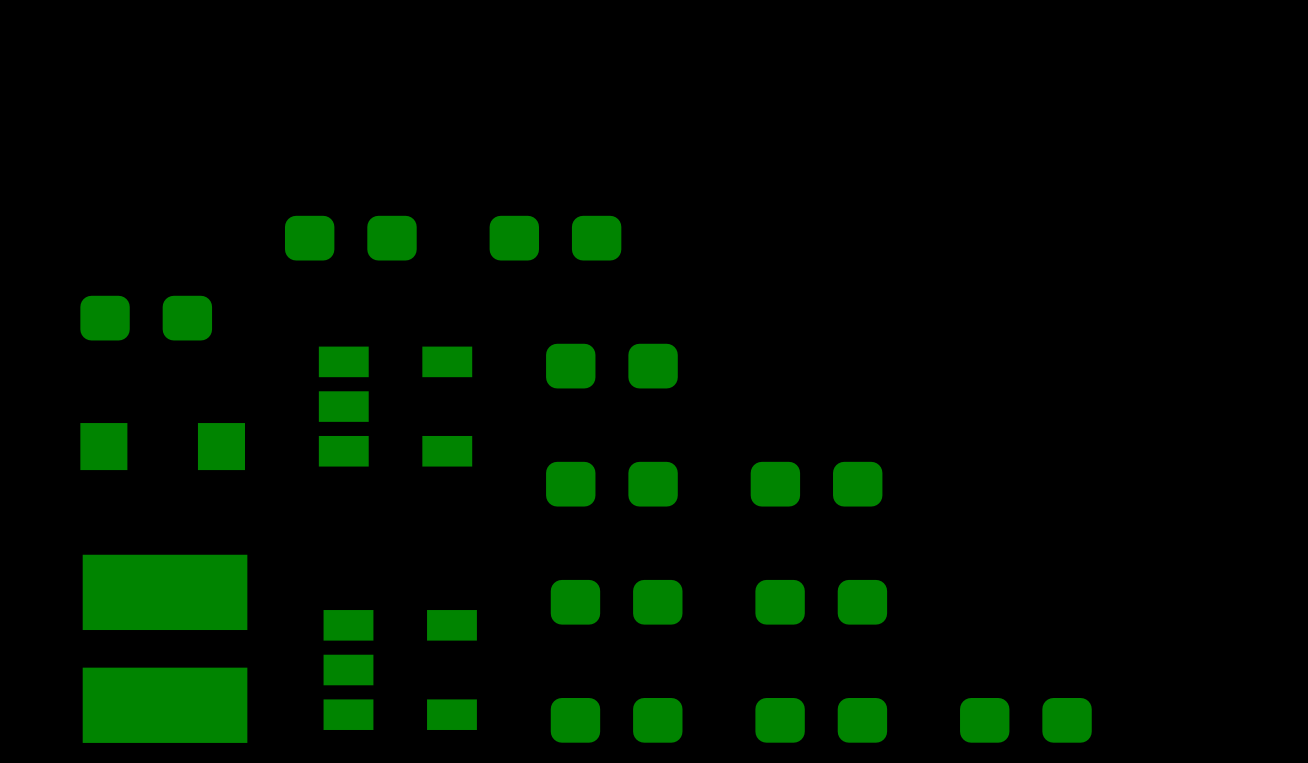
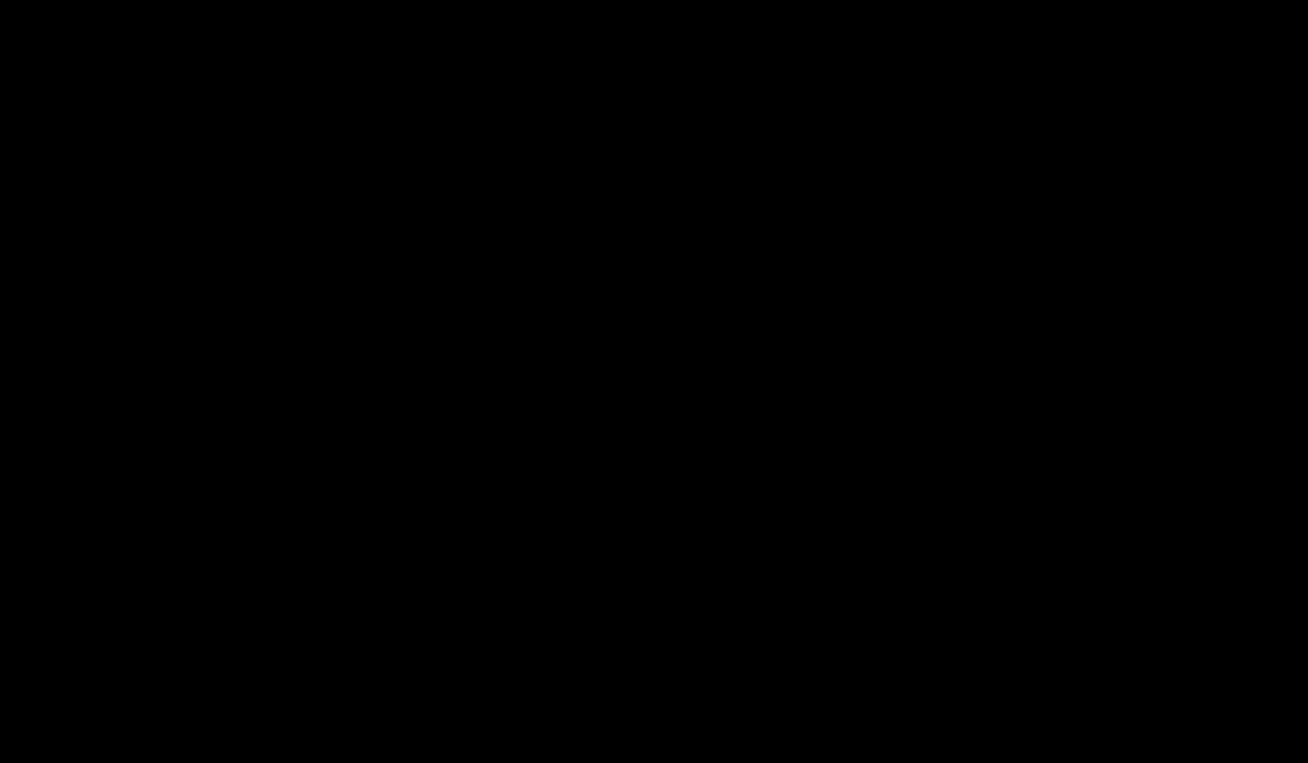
part: (350, 238) -> none
part: (555, 238) -> none
part: (146, 318) -> none
part: (611, 366) -> none
part: (395, 406) -> none
part: (162, 446) -> none
part: (611, 484) -> none
part: (816, 484) -> none
part: (616, 602) -> none
part: (821, 602) -> none
part: (165, 648) -> none
part: (400, 670) -> none
part: (616, 720) -> none
part: (821, 720) -> none
part: (1025, 720) -> none

